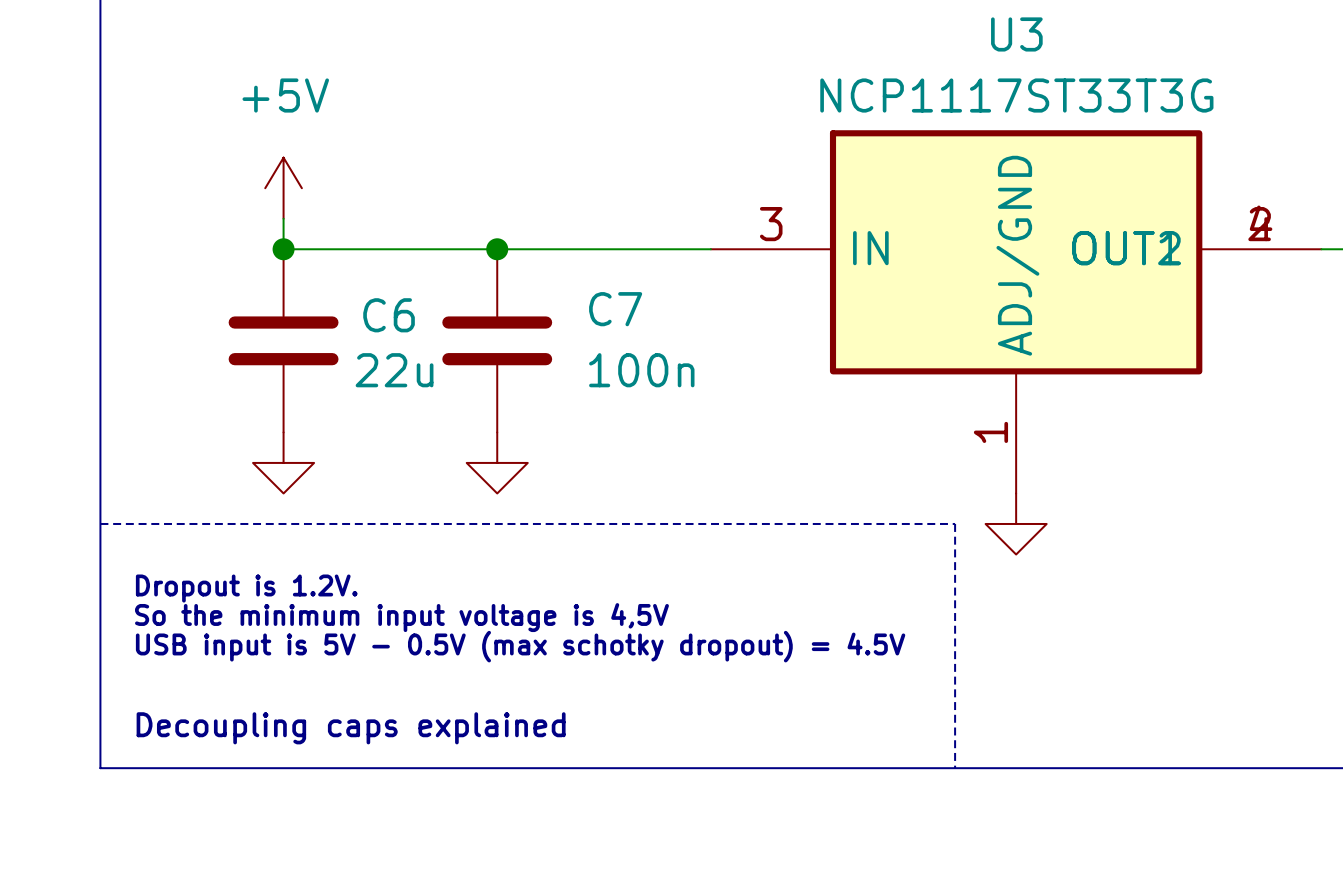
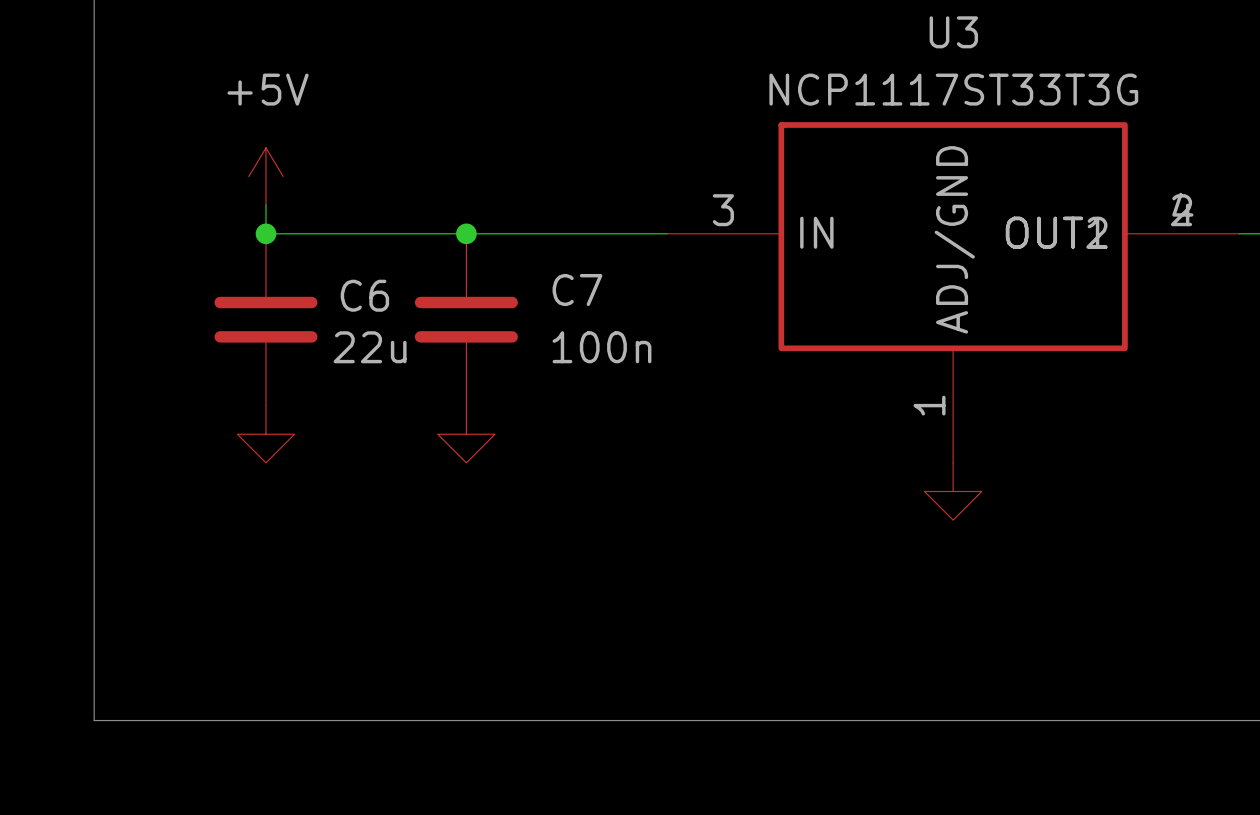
line: (100, 523) (955, 523) (955, 768) -> none
text: Dropout is 1.2V. (246, 588) -> none
text: So the minimum input voltage is 4,5V (401, 617) -> none
text: USB input is 5V - 0.5V (max schotky dropout) = 4.5V (520, 646) -> none
text: Decoupling caps explained (351, 728) -> none

